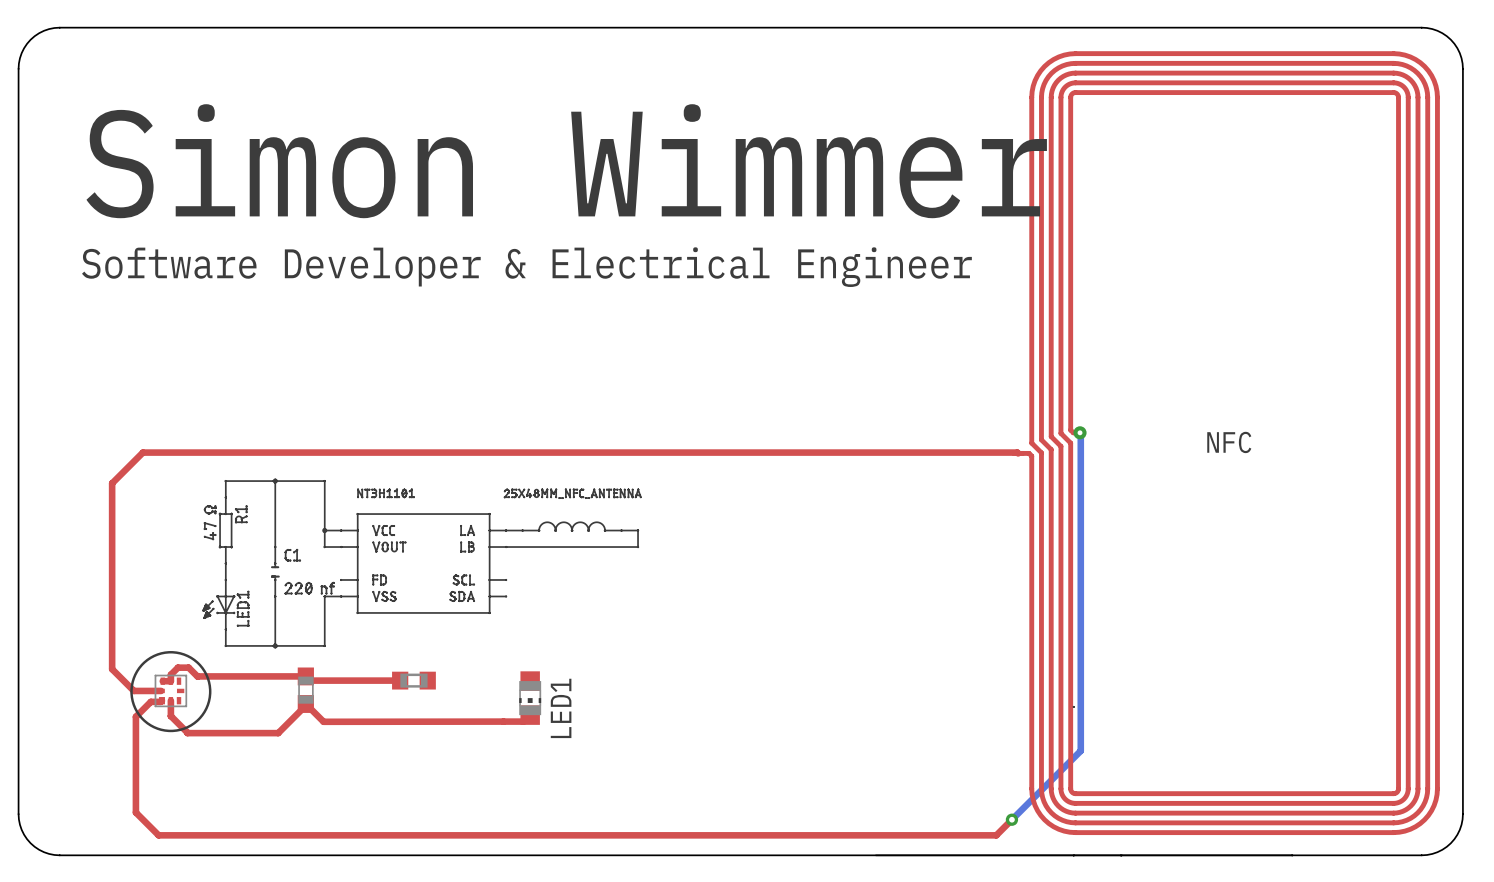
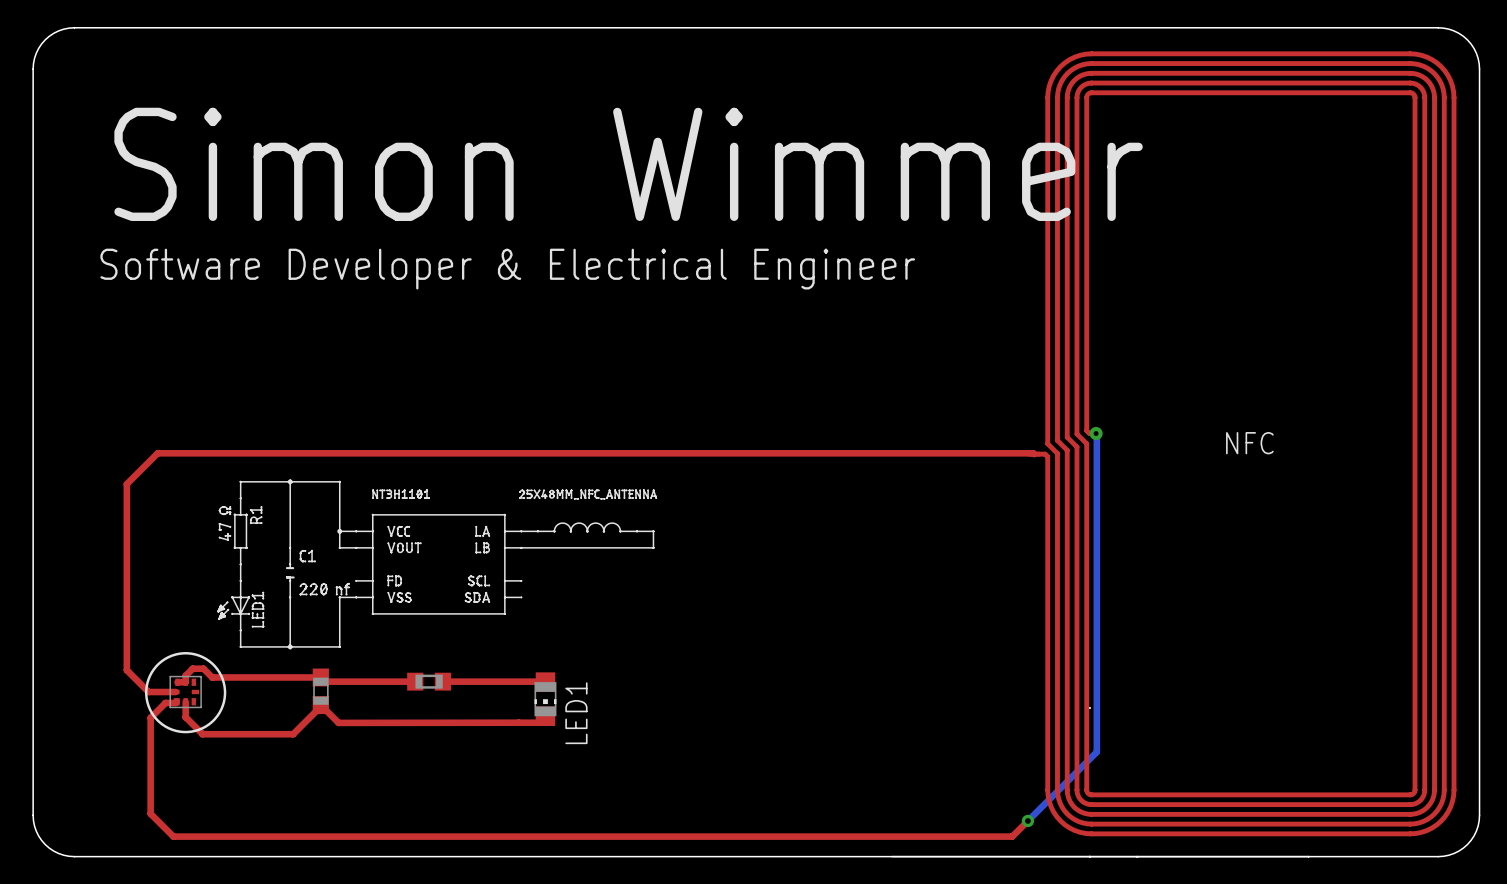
top track: none -> (442, 681) (545, 682)

